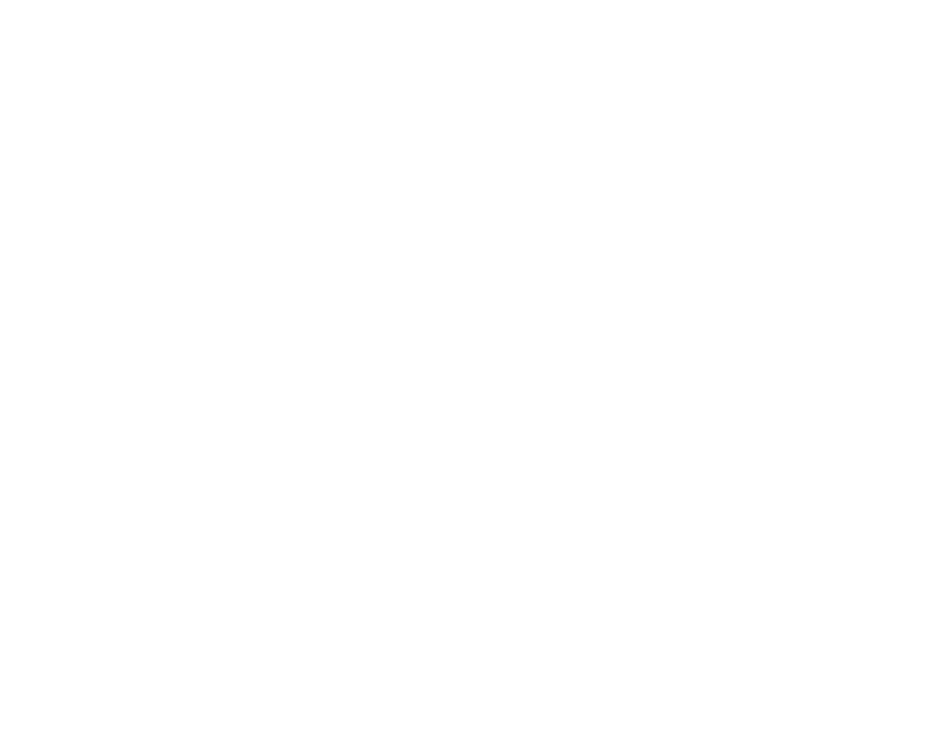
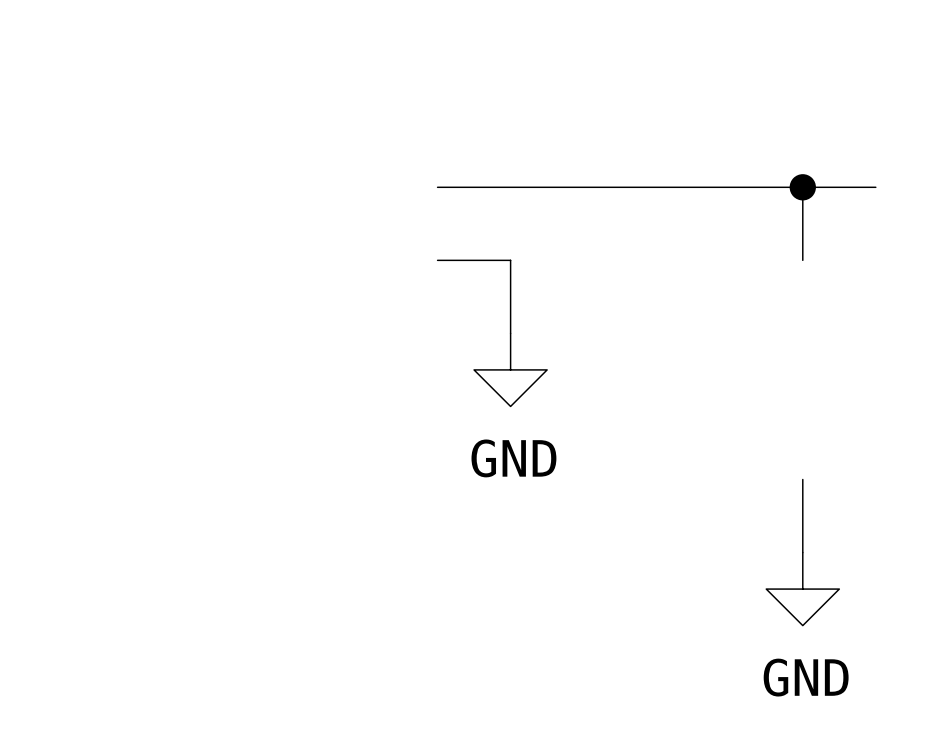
wire: none -> (437, 187) (875, 187)
wire: none -> (802, 187) (802, 260)
junction: none -> (802, 187)
wire: none -> (437, 260) (510, 260) (510, 333)
power symbol: none -> GND (510, 369)
wire: none -> (802, 479) (802, 552)
power symbol: none -> GND (802, 589)

